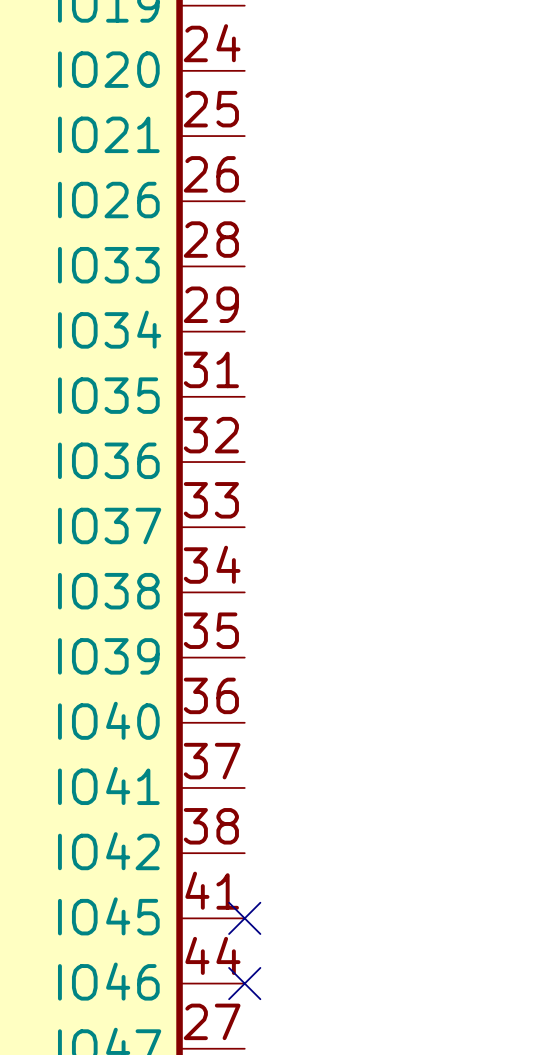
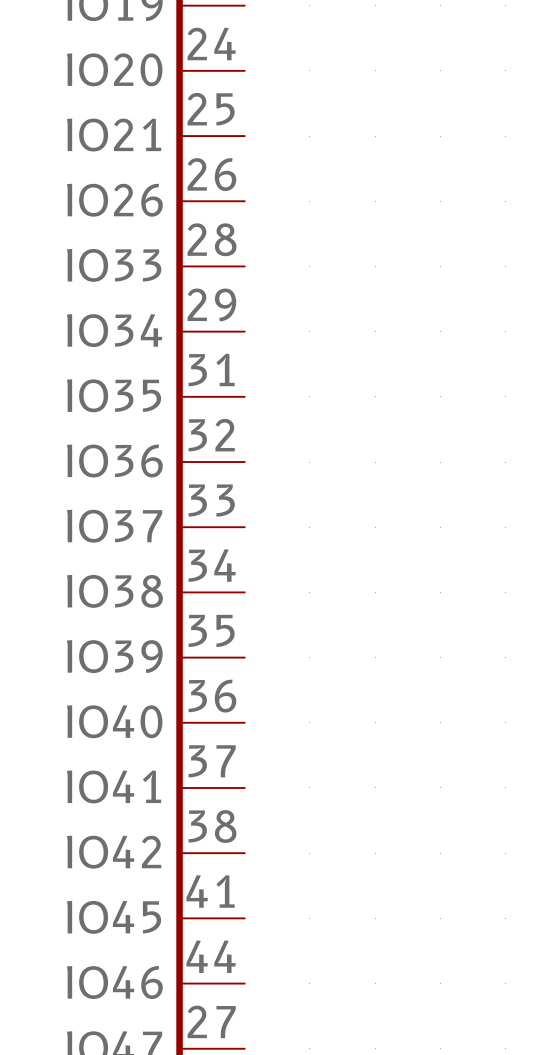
no-connect mark: (244, 918) -> none
no-connect mark: (244, 983) -> none

